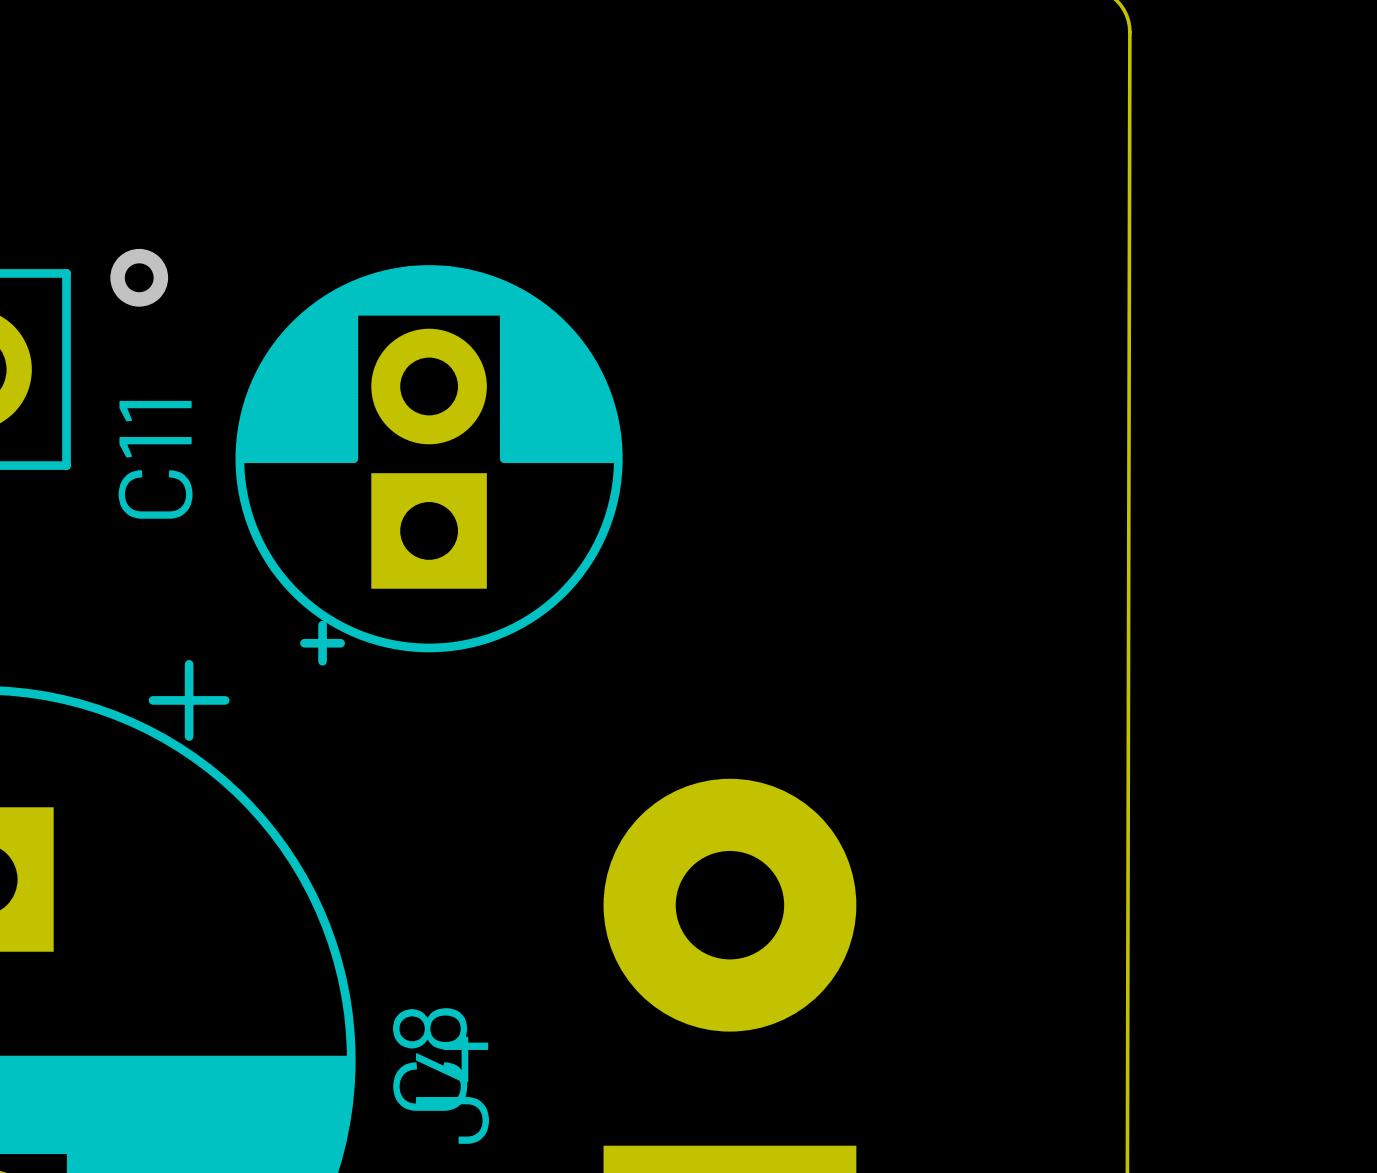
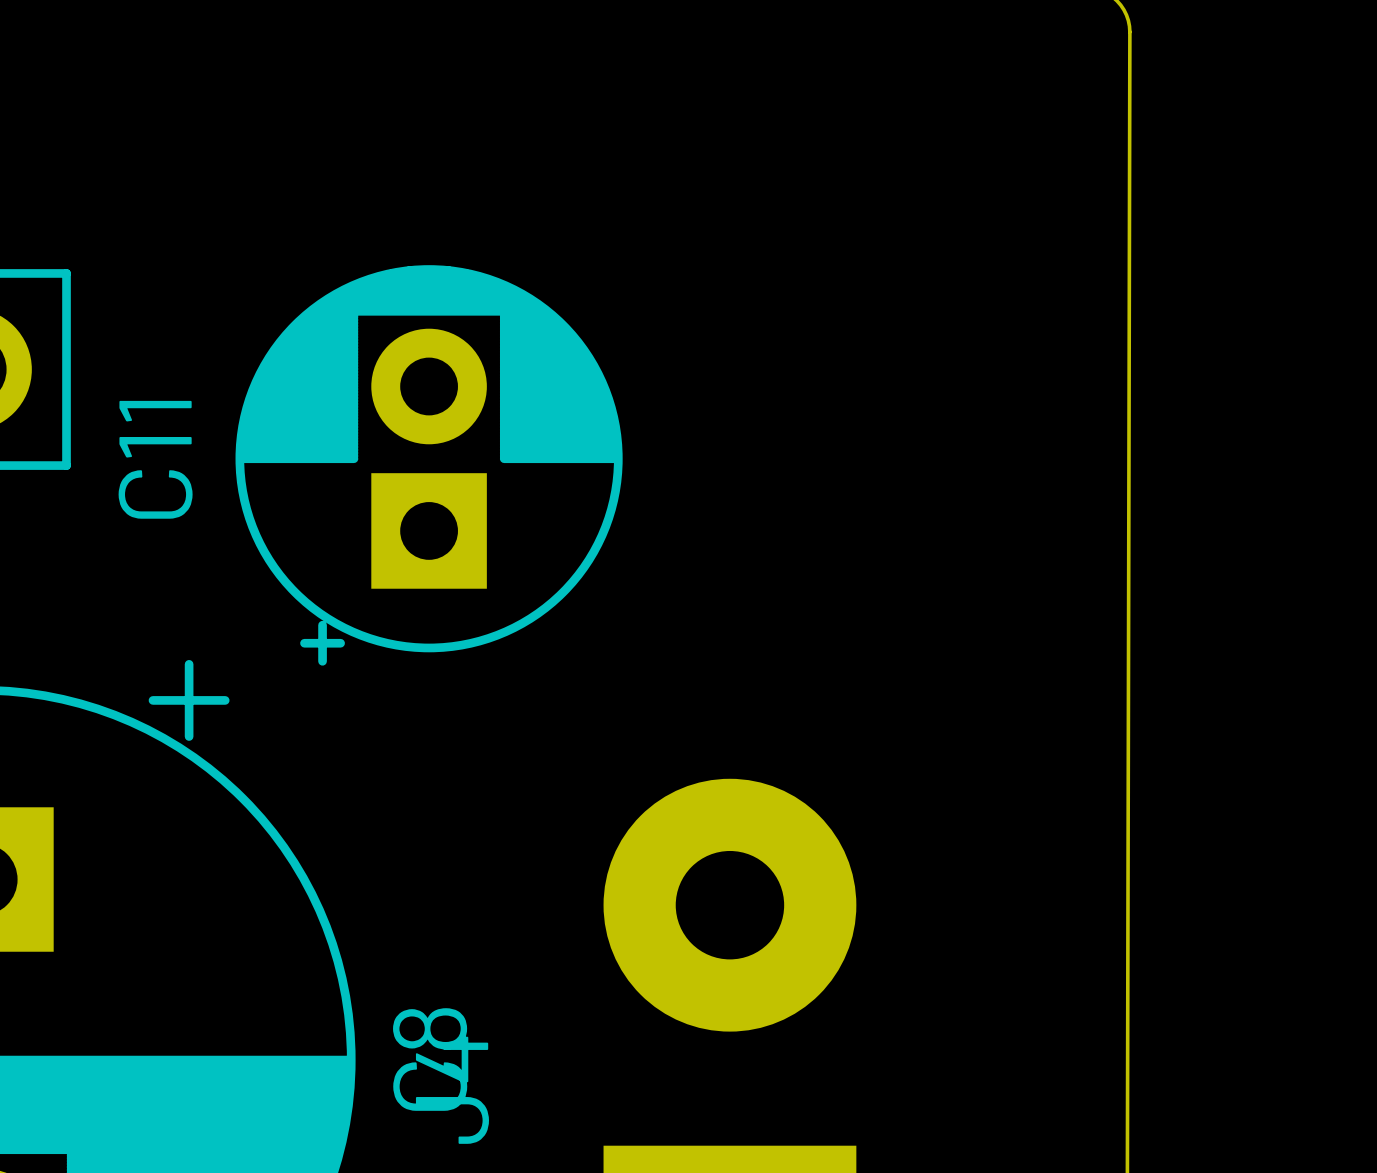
via: (139, 277) -> none

